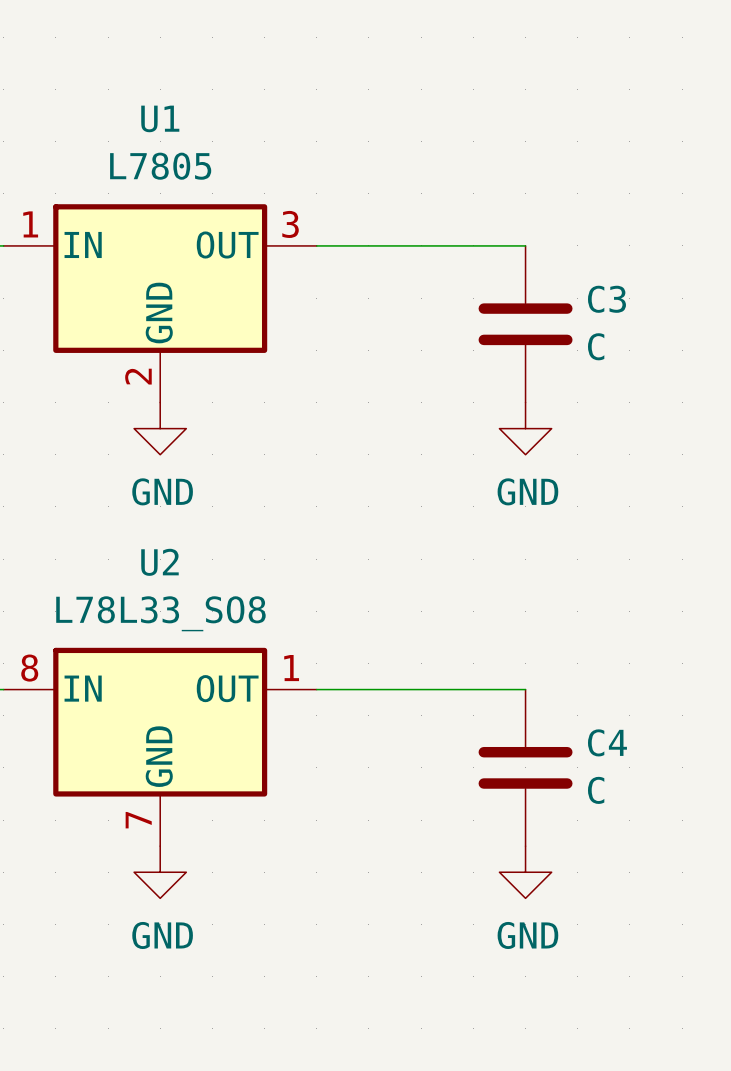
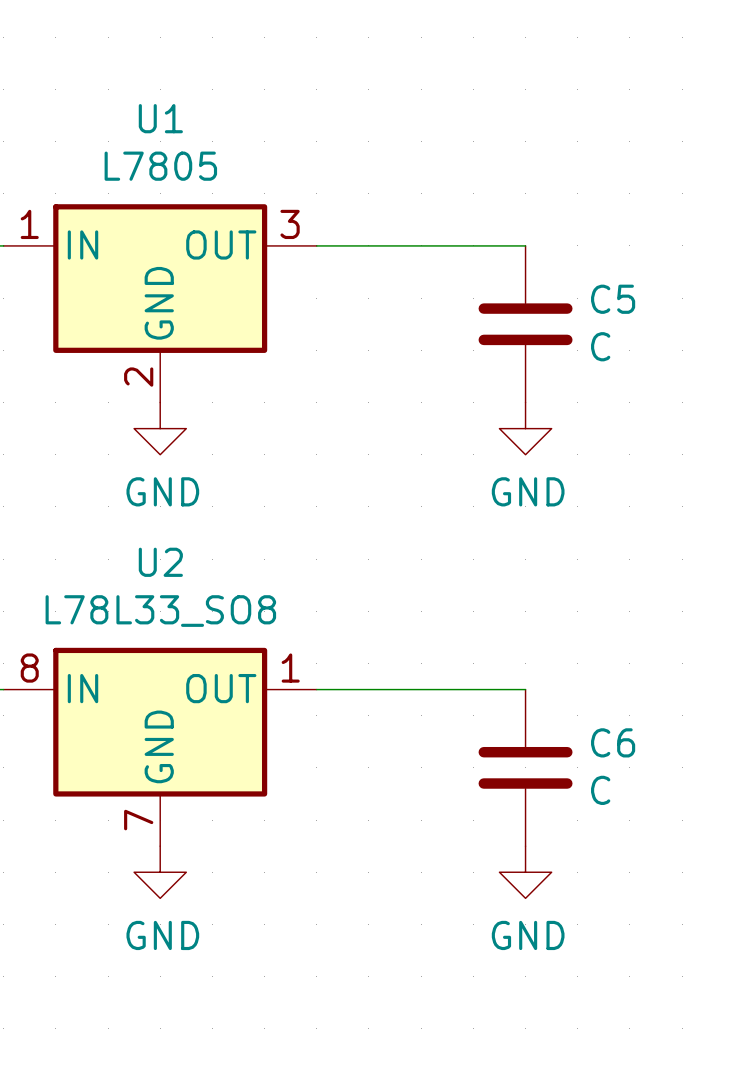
C3 name: C3 (606, 299) -> C5 (613, 299)
C4 name: C4 (607, 742) -> C6 (613, 742)

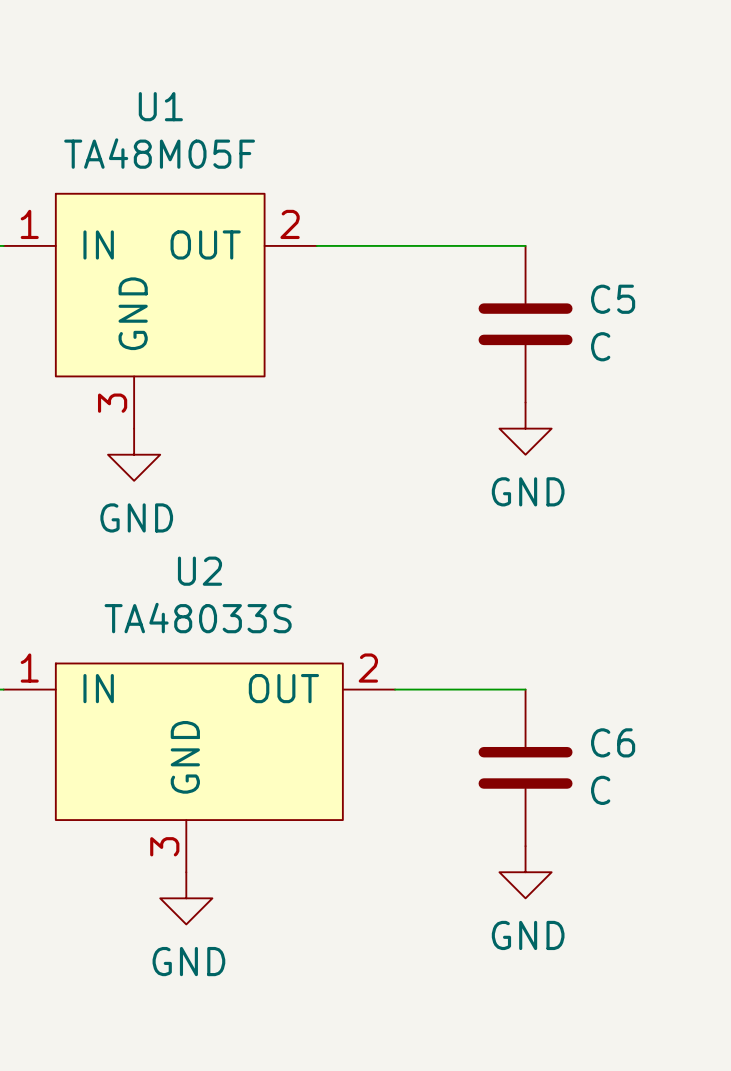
U1 value: L7805 (160, 166) -> TA48M05F (159, 153)
U1 symbol: [3, 204, 317, 403] -> [3, 193, 317, 429]
power symbol position: GND (160, 428) -> GND (134, 454)
U2 value: L78L33_SO8 (160, 611) -> TA48033S (198, 618)
U2 symbol: [3, 647, 317, 847] -> [3, 663, 396, 873]
power symbol position: GND (160, 872) -> GND (186, 898)

